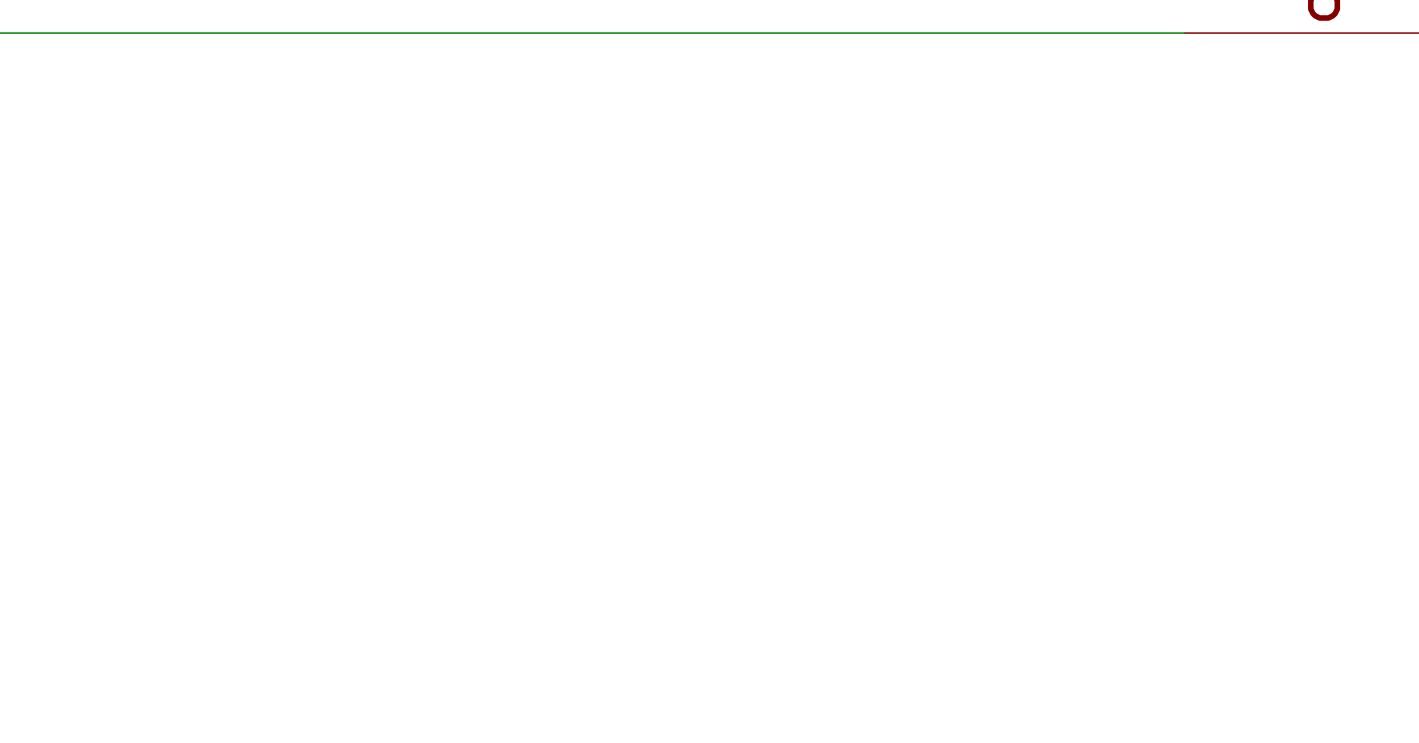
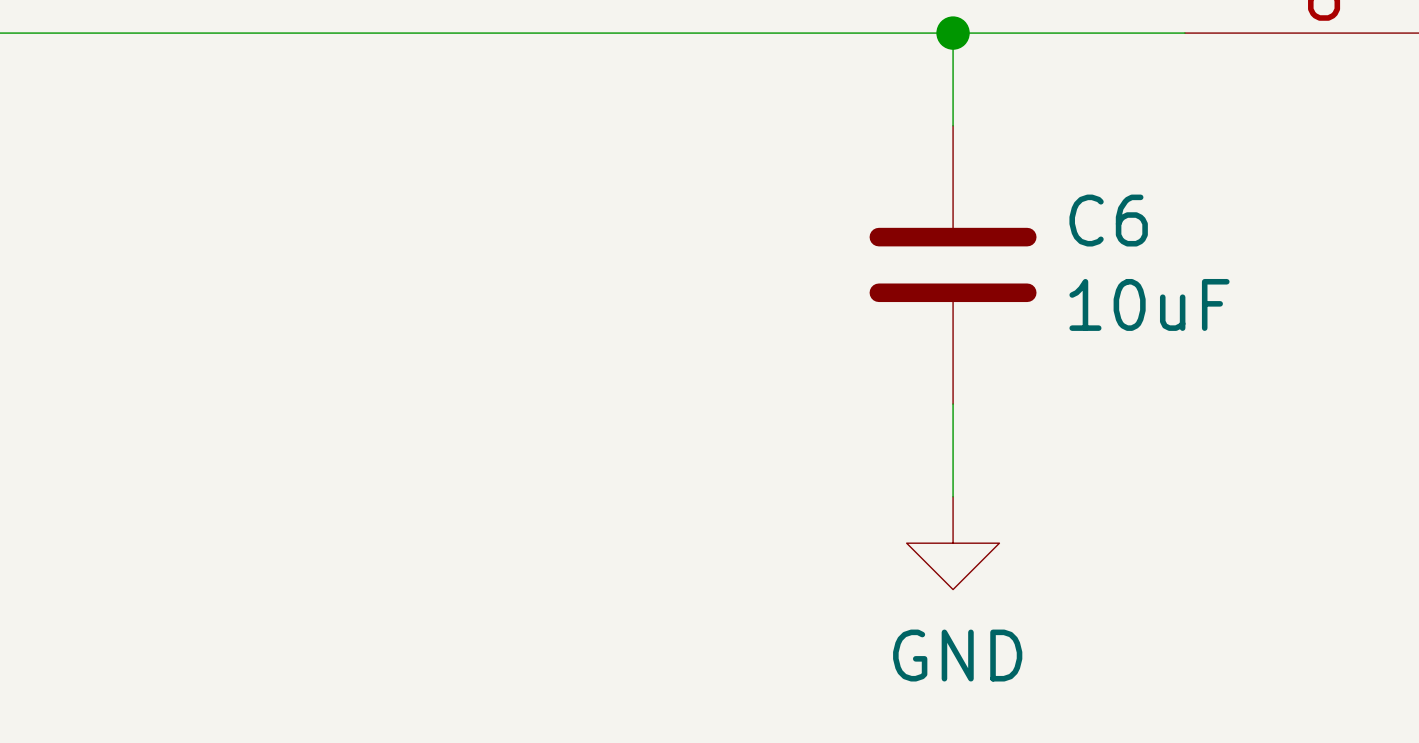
wire: none -> (953, 33) (953, 125)
junction: none -> (953, 33)
C6: none -> 10uF (953, 264)
wire: none -> (953, 404) (953, 496)
power symbol: none -> GND (953, 543)

